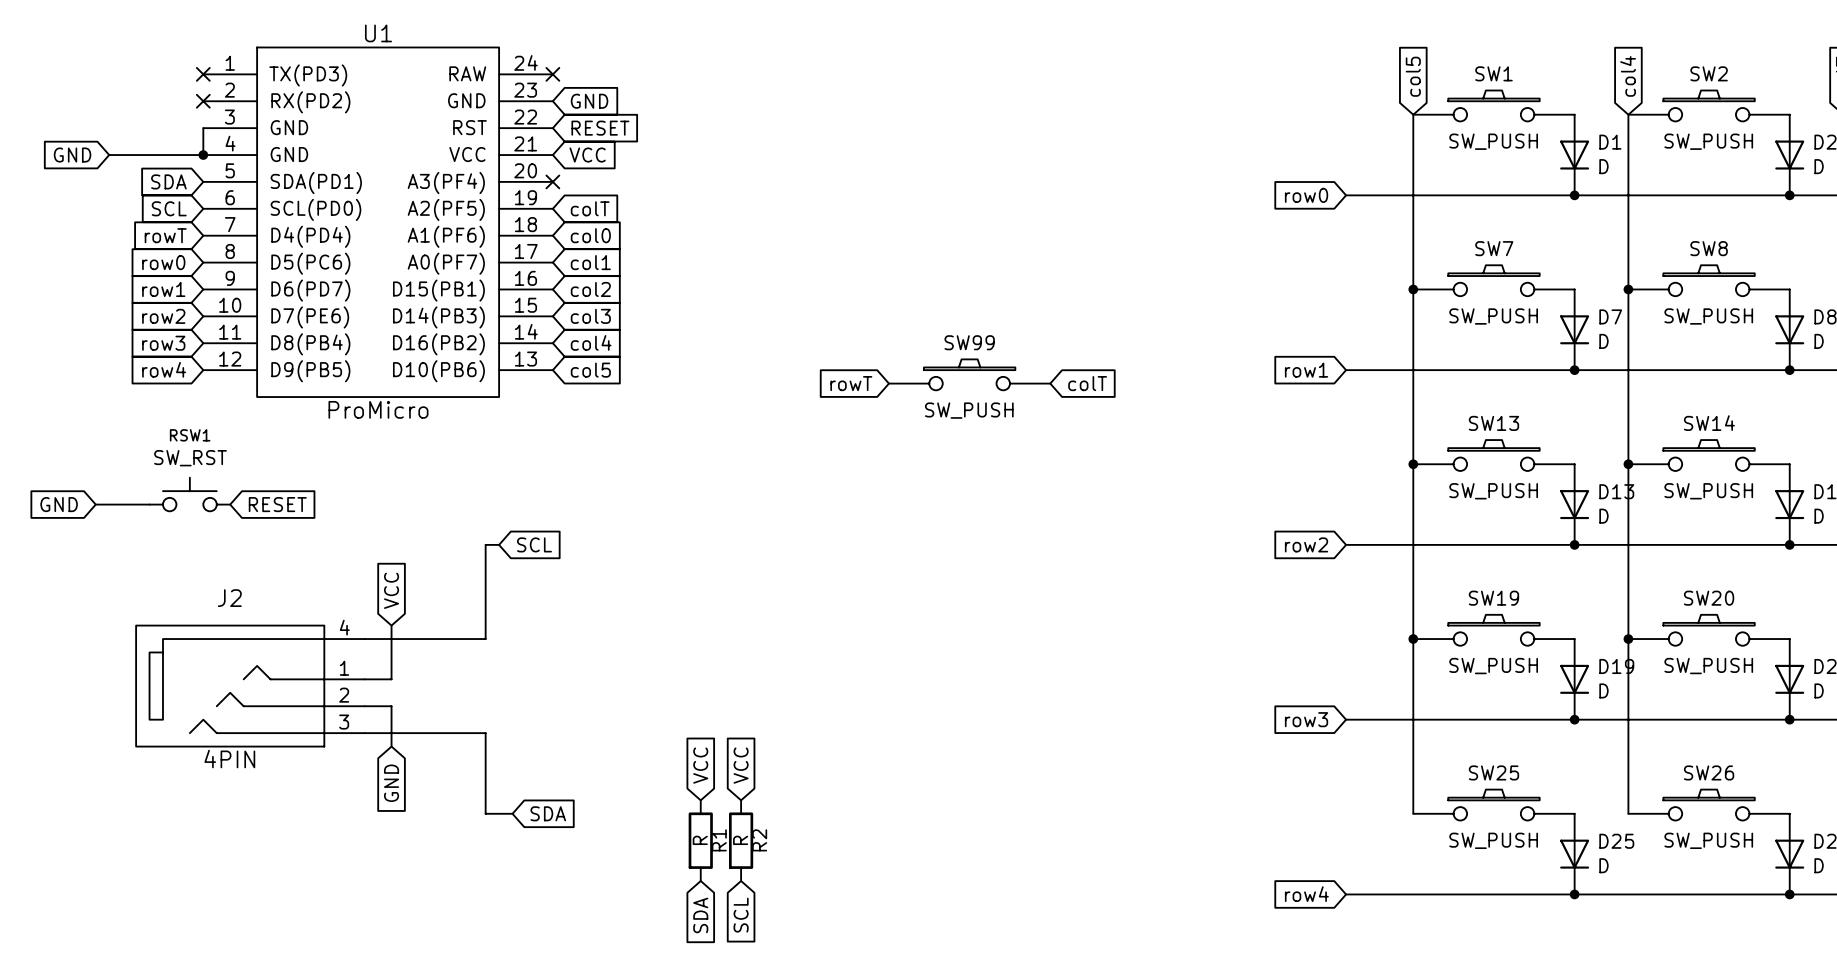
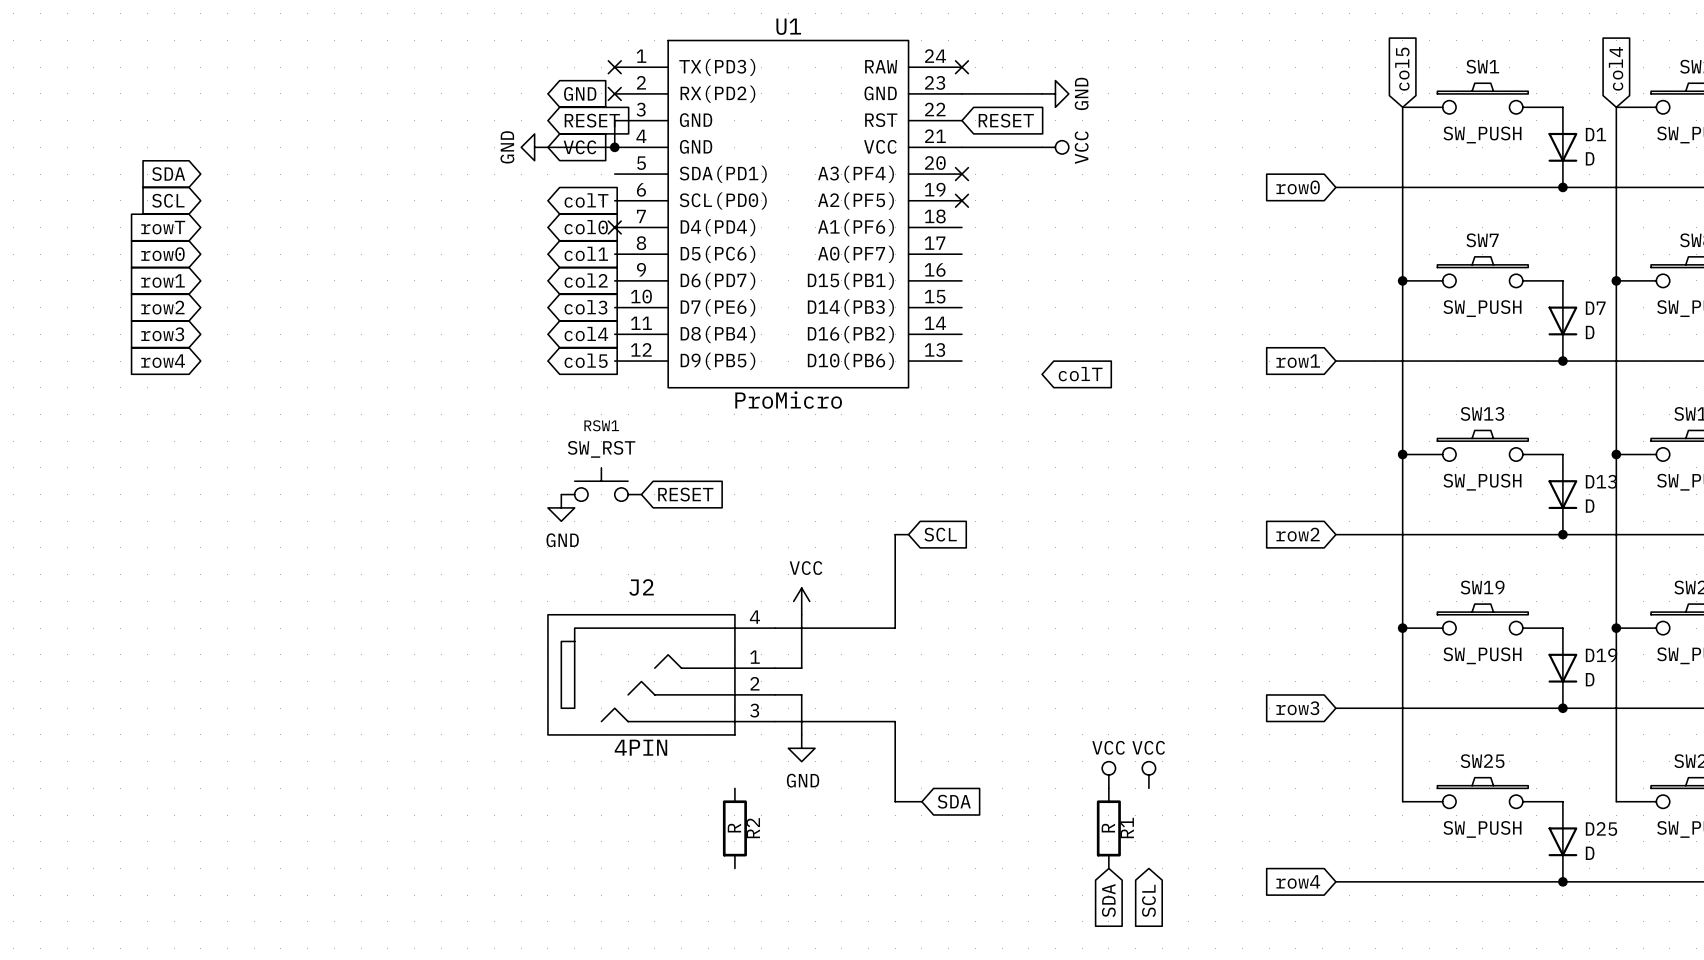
no-connect mark: (203, 74) -> none
no-connect mark: (552, 74) -> none
no-connect mark: none -> (614, 67)
no-connect mark: none -> (961, 67)
no-connect mark: (203, 101) -> none
no-connect mark: none -> (614, 93)
wire: none -> (961, 93) (1042, 93)
power symbol: none -> GND (1055, 93)
wire: (203, 128) (203, 155) (109, 155) -> none
wire: none -> (614, 120) (614, 147) (547, 147)
global label: none -> RESET (1006, 120)
global label: GND (72, 155) -> none
junction: (203, 155) -> none
power symbol: none -> GND (534, 147)
junction: none -> (614, 147)
wire: none -> (961, 147) (1042, 147)
power symbol: none -> VCC (1055, 147)
no-connect mark: (552, 181) -> none
no-connect mark: none -> (961, 174)
no-connect mark: none -> (961, 200)
U1 position: (378, 222) -> (788, 214)
no-connect mark: none -> (614, 227)
SW99: SW_PUSH (969, 374) -> none
global label: rowT (851, 383) -> none
RSW1 position: (189, 494) -> (601, 484)
global label: GND (59, 504) -> none
wire: (95, 504) (149, 504) -> none
global label: RESET (277, 504) -> none
global label: none -> RESET (685, 494)
power symbol: none -> GND (561, 507)
wire: (499, 544) (485, 544) (485, 639) (364, 639) -> none
global label: SCL (534, 544) -> none
wire: none -> (908, 534) (895, 534) (895, 628) (775, 628)
global label: none -> SCL (940, 534)
global label: VCC (391, 590) -> none
power symbol: none -> VCC (801, 601)
wire: (391, 625) (391, 679) (364, 679) -> none
wire: none -> (801, 614) (801, 668) (775, 668)
J2 position: (250, 686) -> (661, 674)
wire: (364, 706) (391, 706) (391, 746) -> none
wire: none -> (775, 694) (801, 694) (801, 734)
wire: (364, 733) (485, 733) (485, 813) (512, 813) -> none
wire: none -> (775, 721) (895, 721) (895, 801) (921, 801)
power symbol: none -> GND (801, 748)
global label: VCC (700, 765) -> none
global label: VCC (741, 765) -> none
global label: GND (391, 783) -> none
power symbol: none -> VCC (1108, 775)
power symbol: none -> VCC (1148, 775)
global label: SDA (548, 813) -> none
global label: none -> SDA (954, 801)
R1 position: (700, 840) -> (1108, 828)
global label: SDA (700, 915) -> none
global label: SCL (741, 915) -> none
global label: none -> SDA (1108, 900)
global label: none -> SCL (1148, 900)

